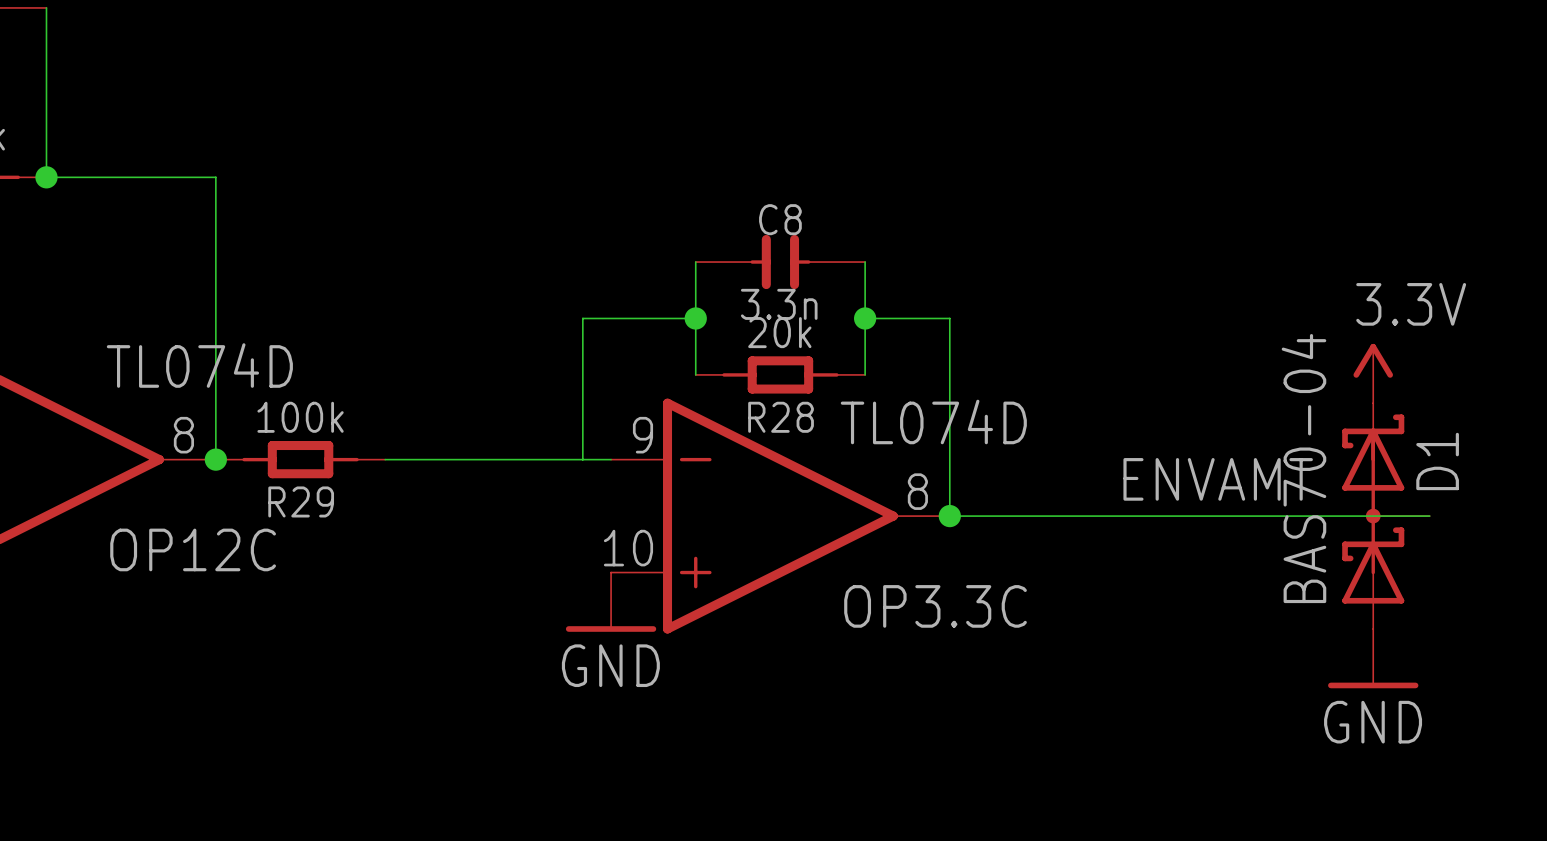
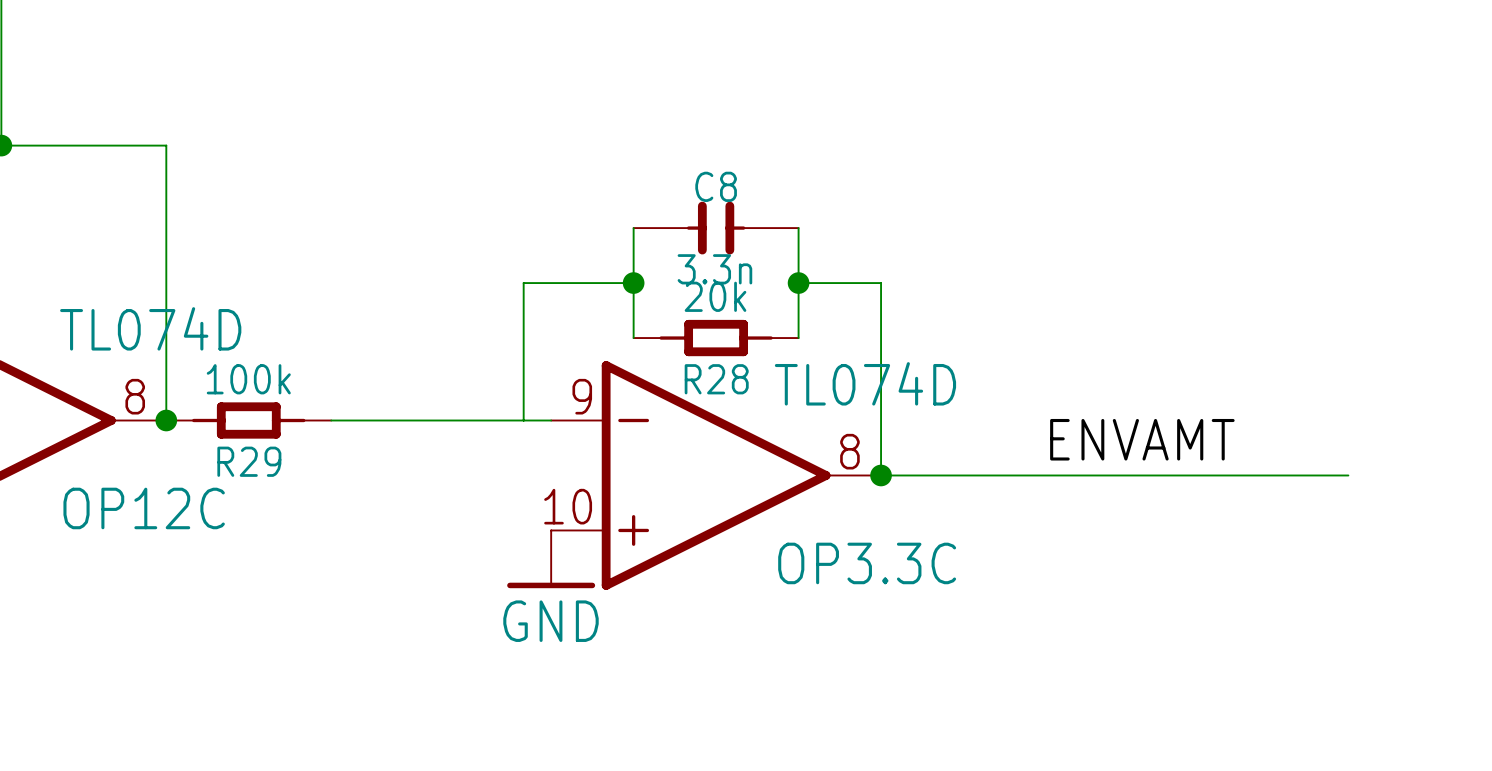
power symbol: 3.3V (1373, 373) -> none
D1: BAS70-04 (1385, 516) -> none
power symbol: GND (1373, 658) -> none

